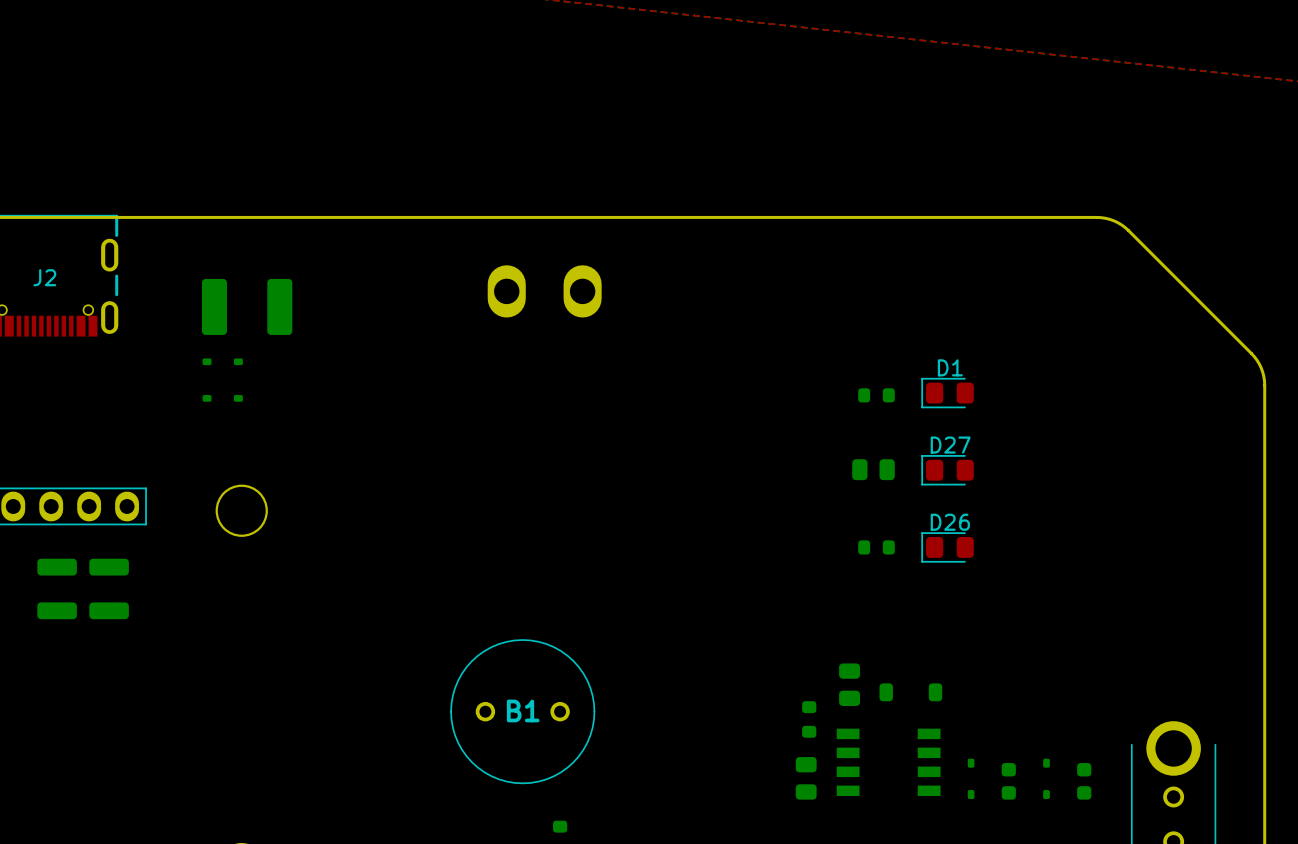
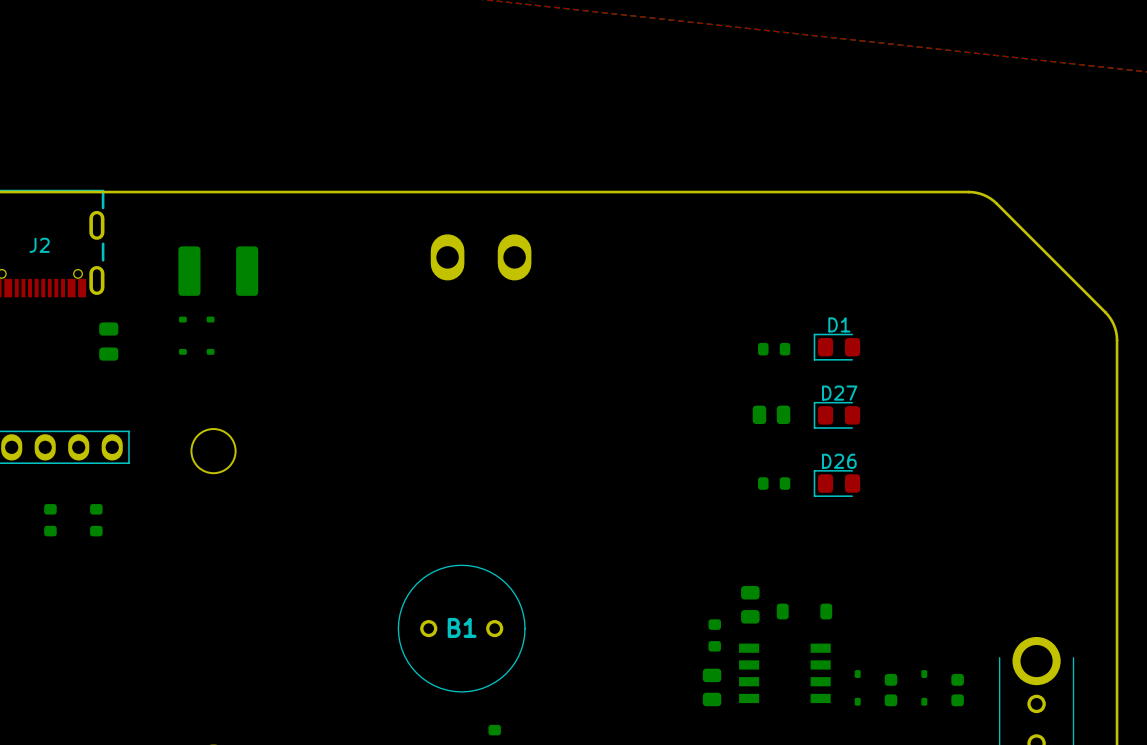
part: none -> (108, 341)
part footprint: [37, 558, 77, 620] -> [44, 504, 57, 537]
part footprint: [89, 558, 129, 620] -> [90, 504, 103, 537]

